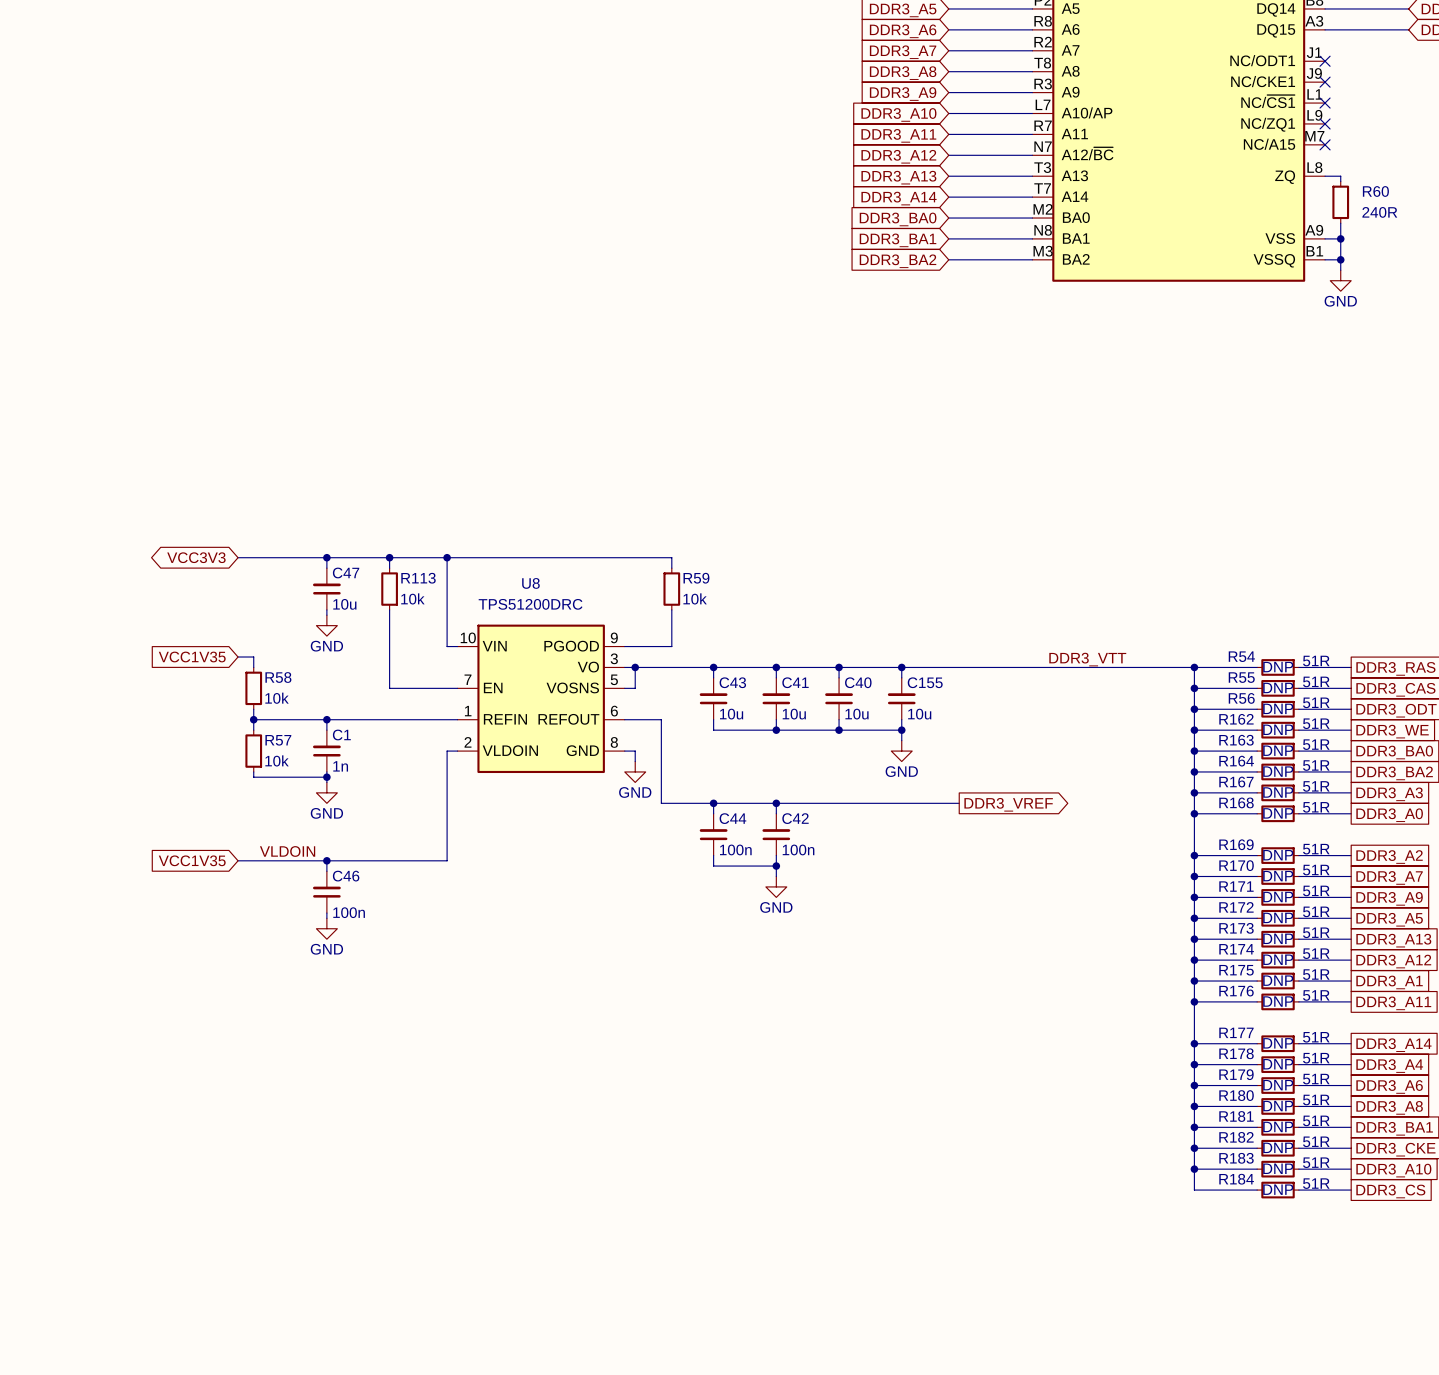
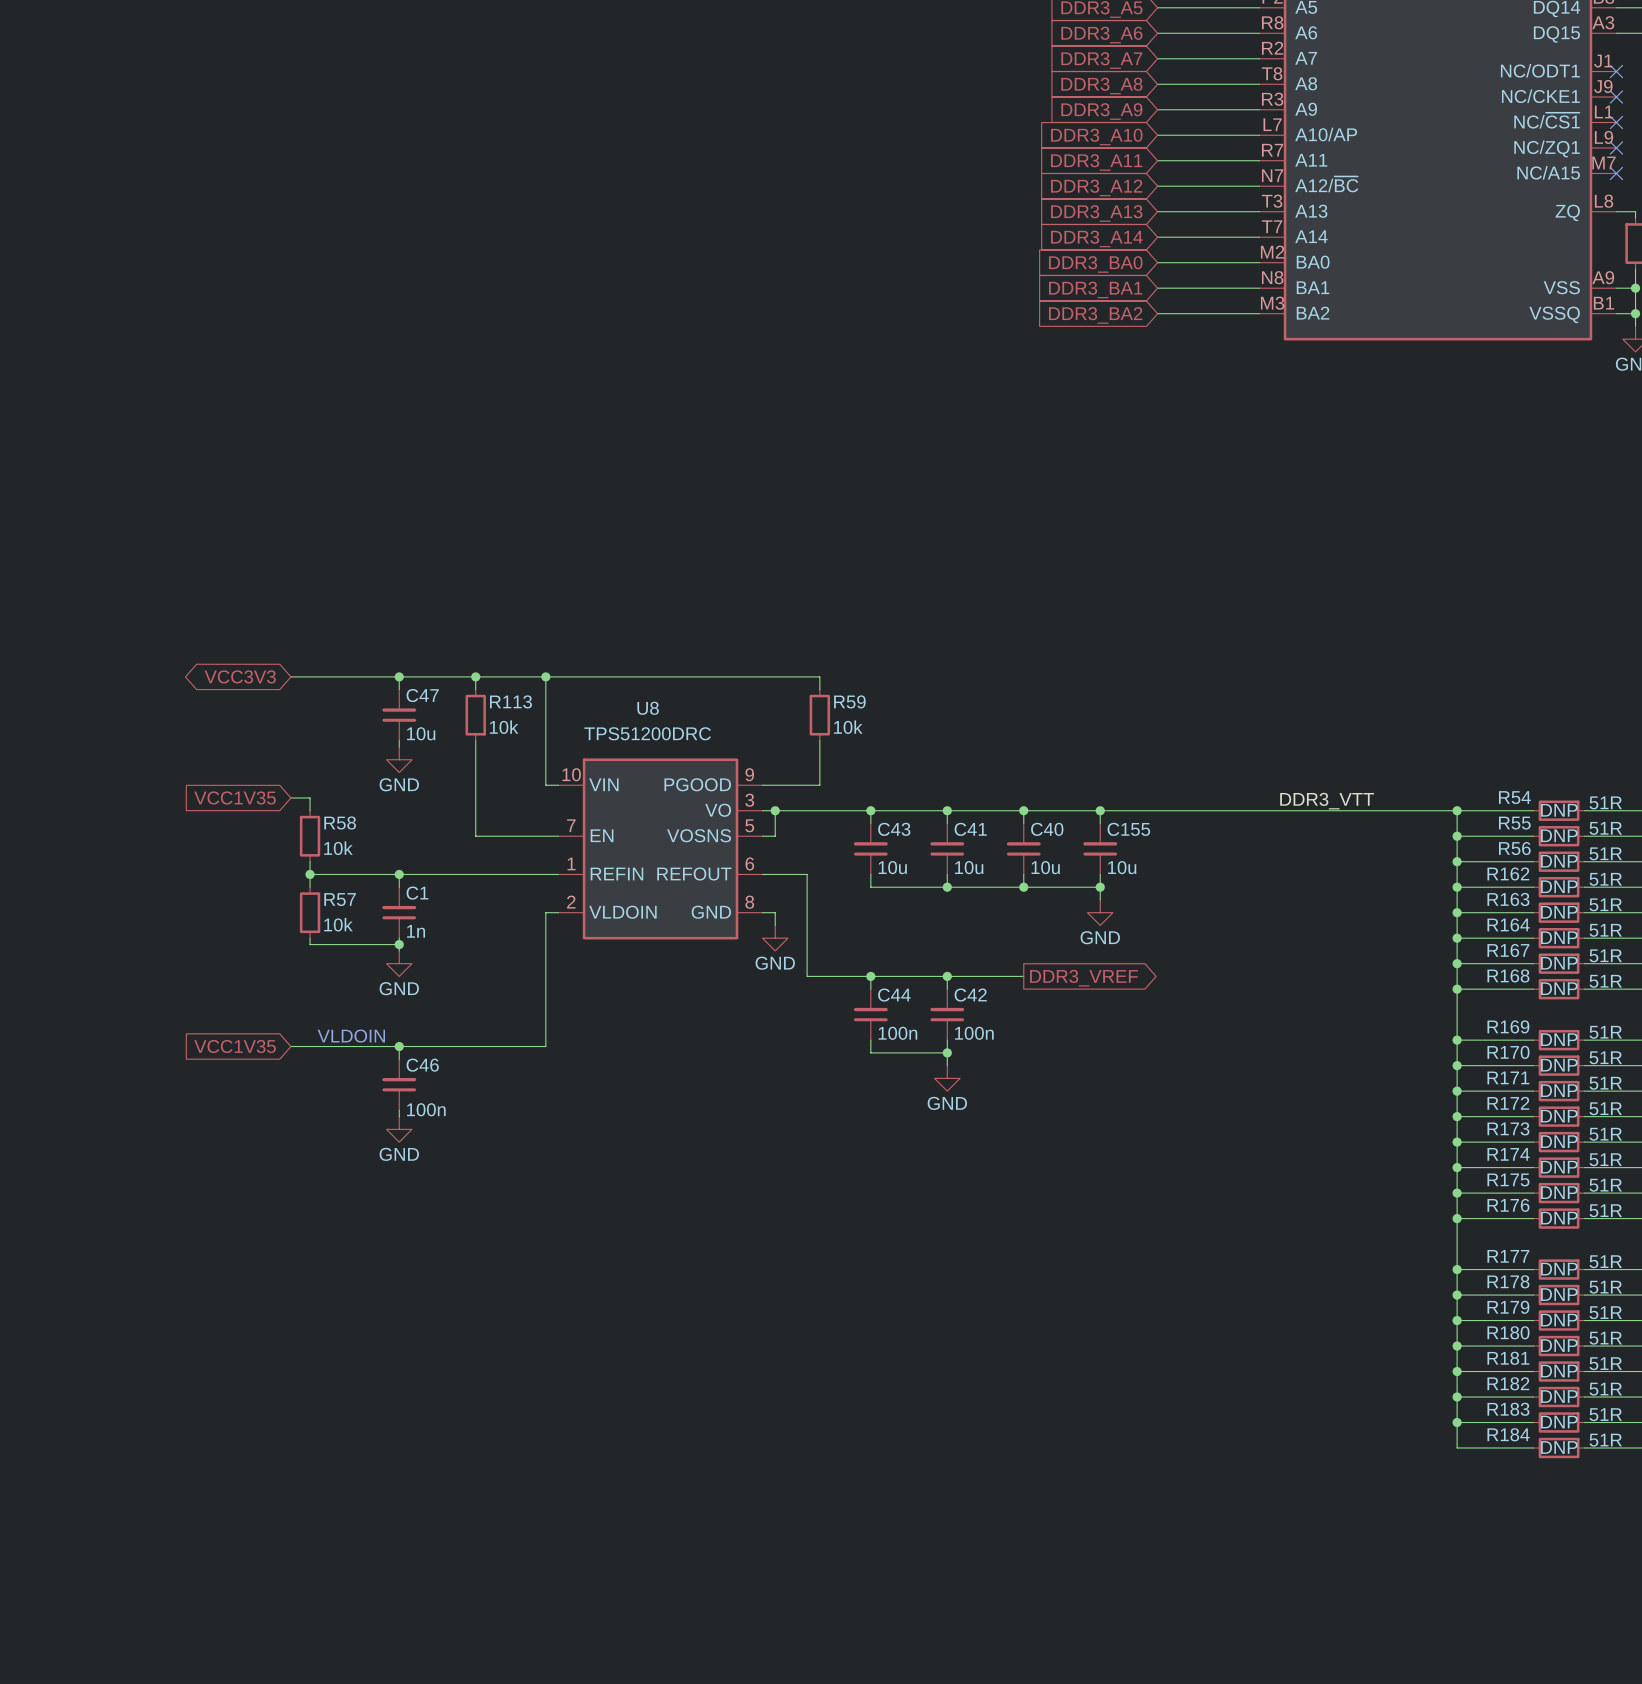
wire: (839, 803) (959, 803) -> none
global label position: DDR3_VREF (1008, 804) -> DDR3_VREF (1084, 978)
label: VLDOIN (287, 851) -> none
text: none -> VLDOIN (351, 1036)

